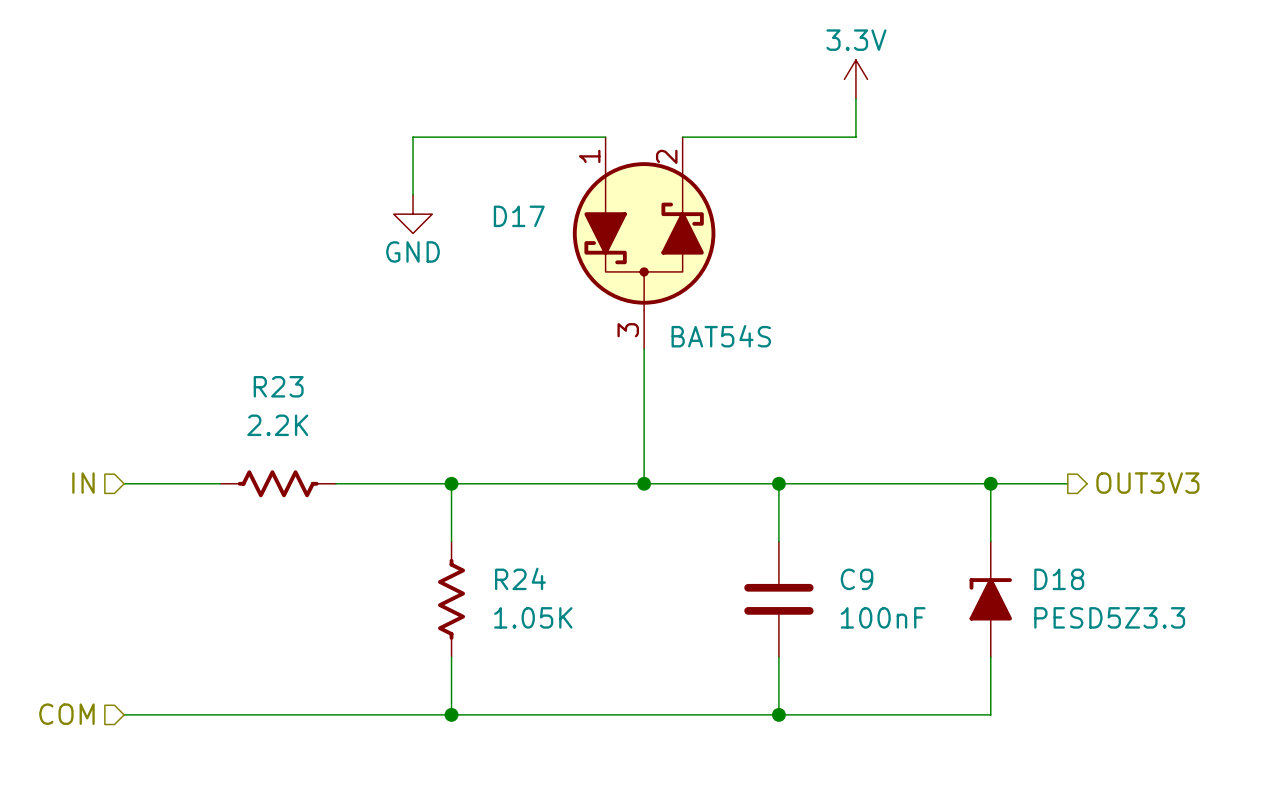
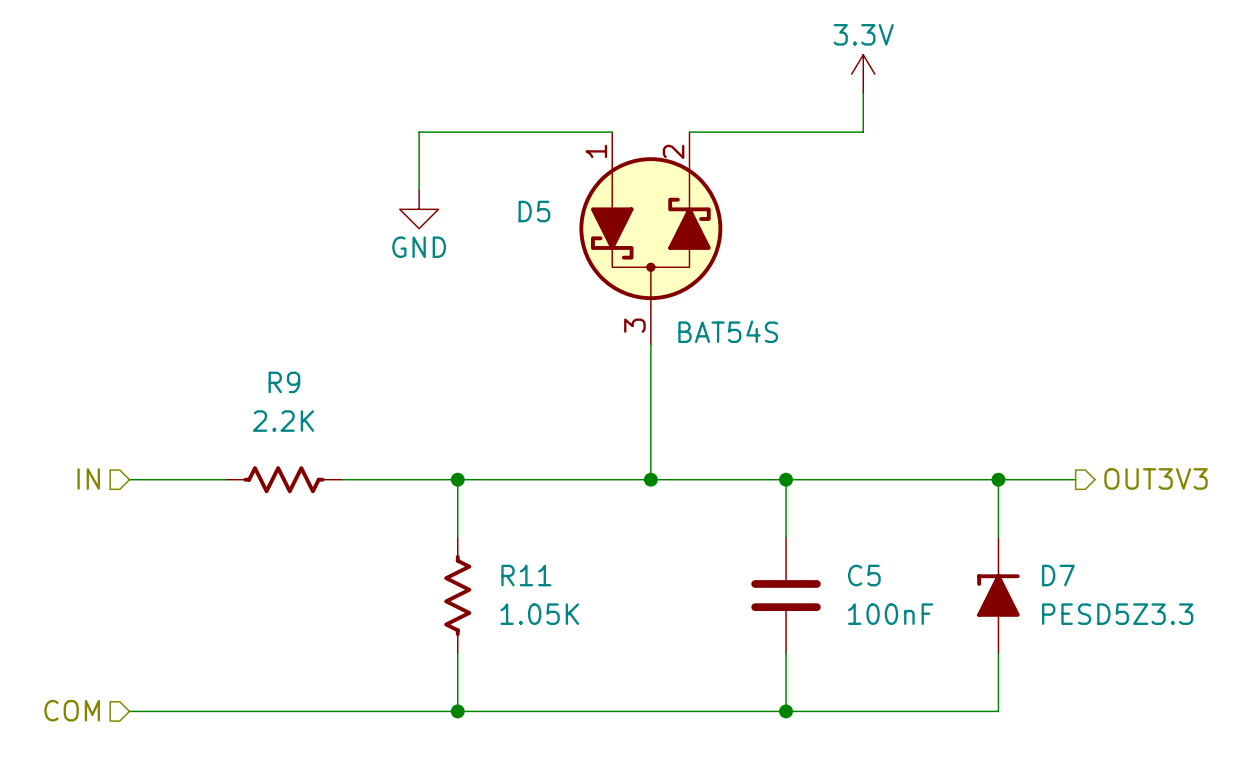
D17 name: D17 (519, 216) -> D5 (534, 211)
R23 name: R23 (278, 386) -> R9 (284, 382)
R24 name: R24 (520, 578) -> R11 (526, 575)
C9 name: C9 (857, 579) -> C5 (864, 575)
D18 name: D18 (1059, 579) -> D7 (1058, 575)

